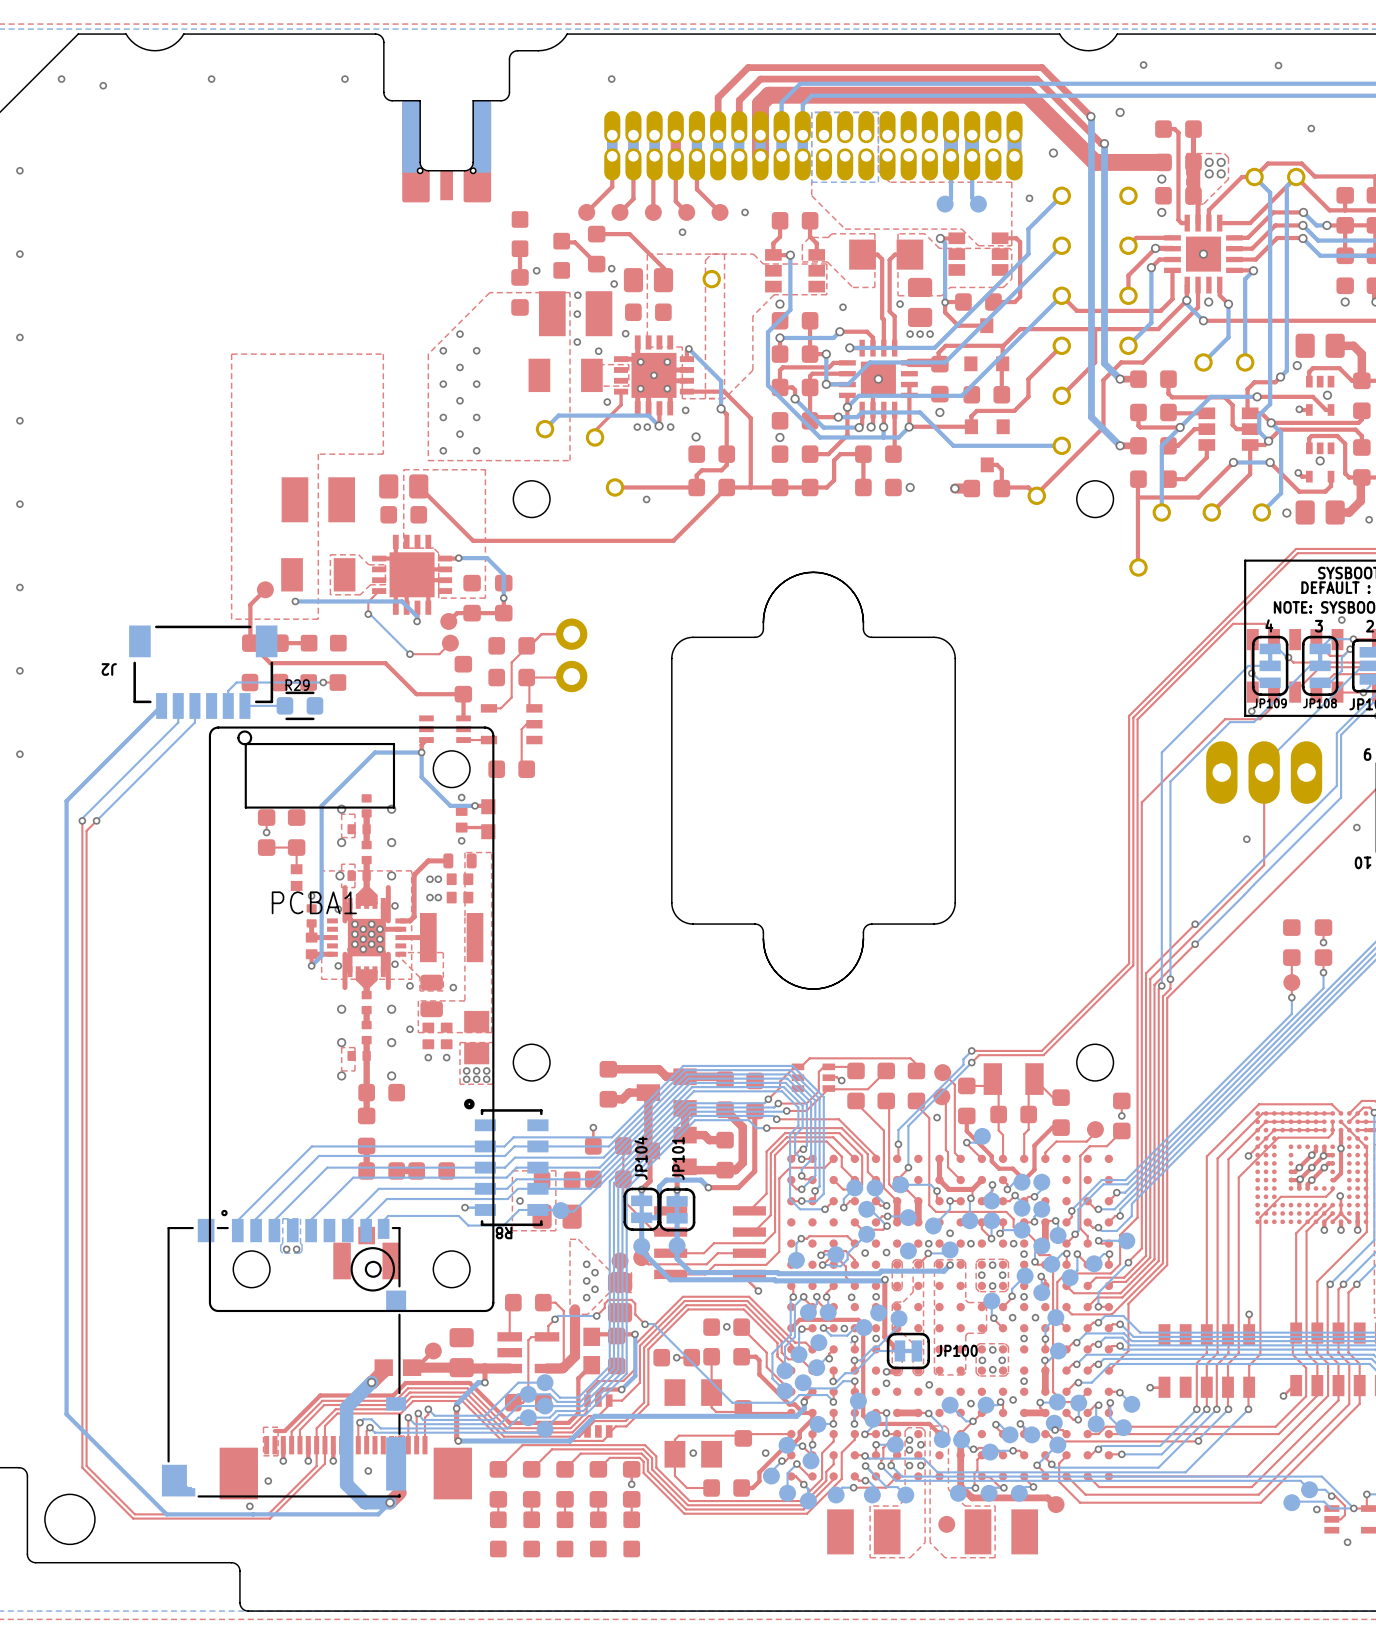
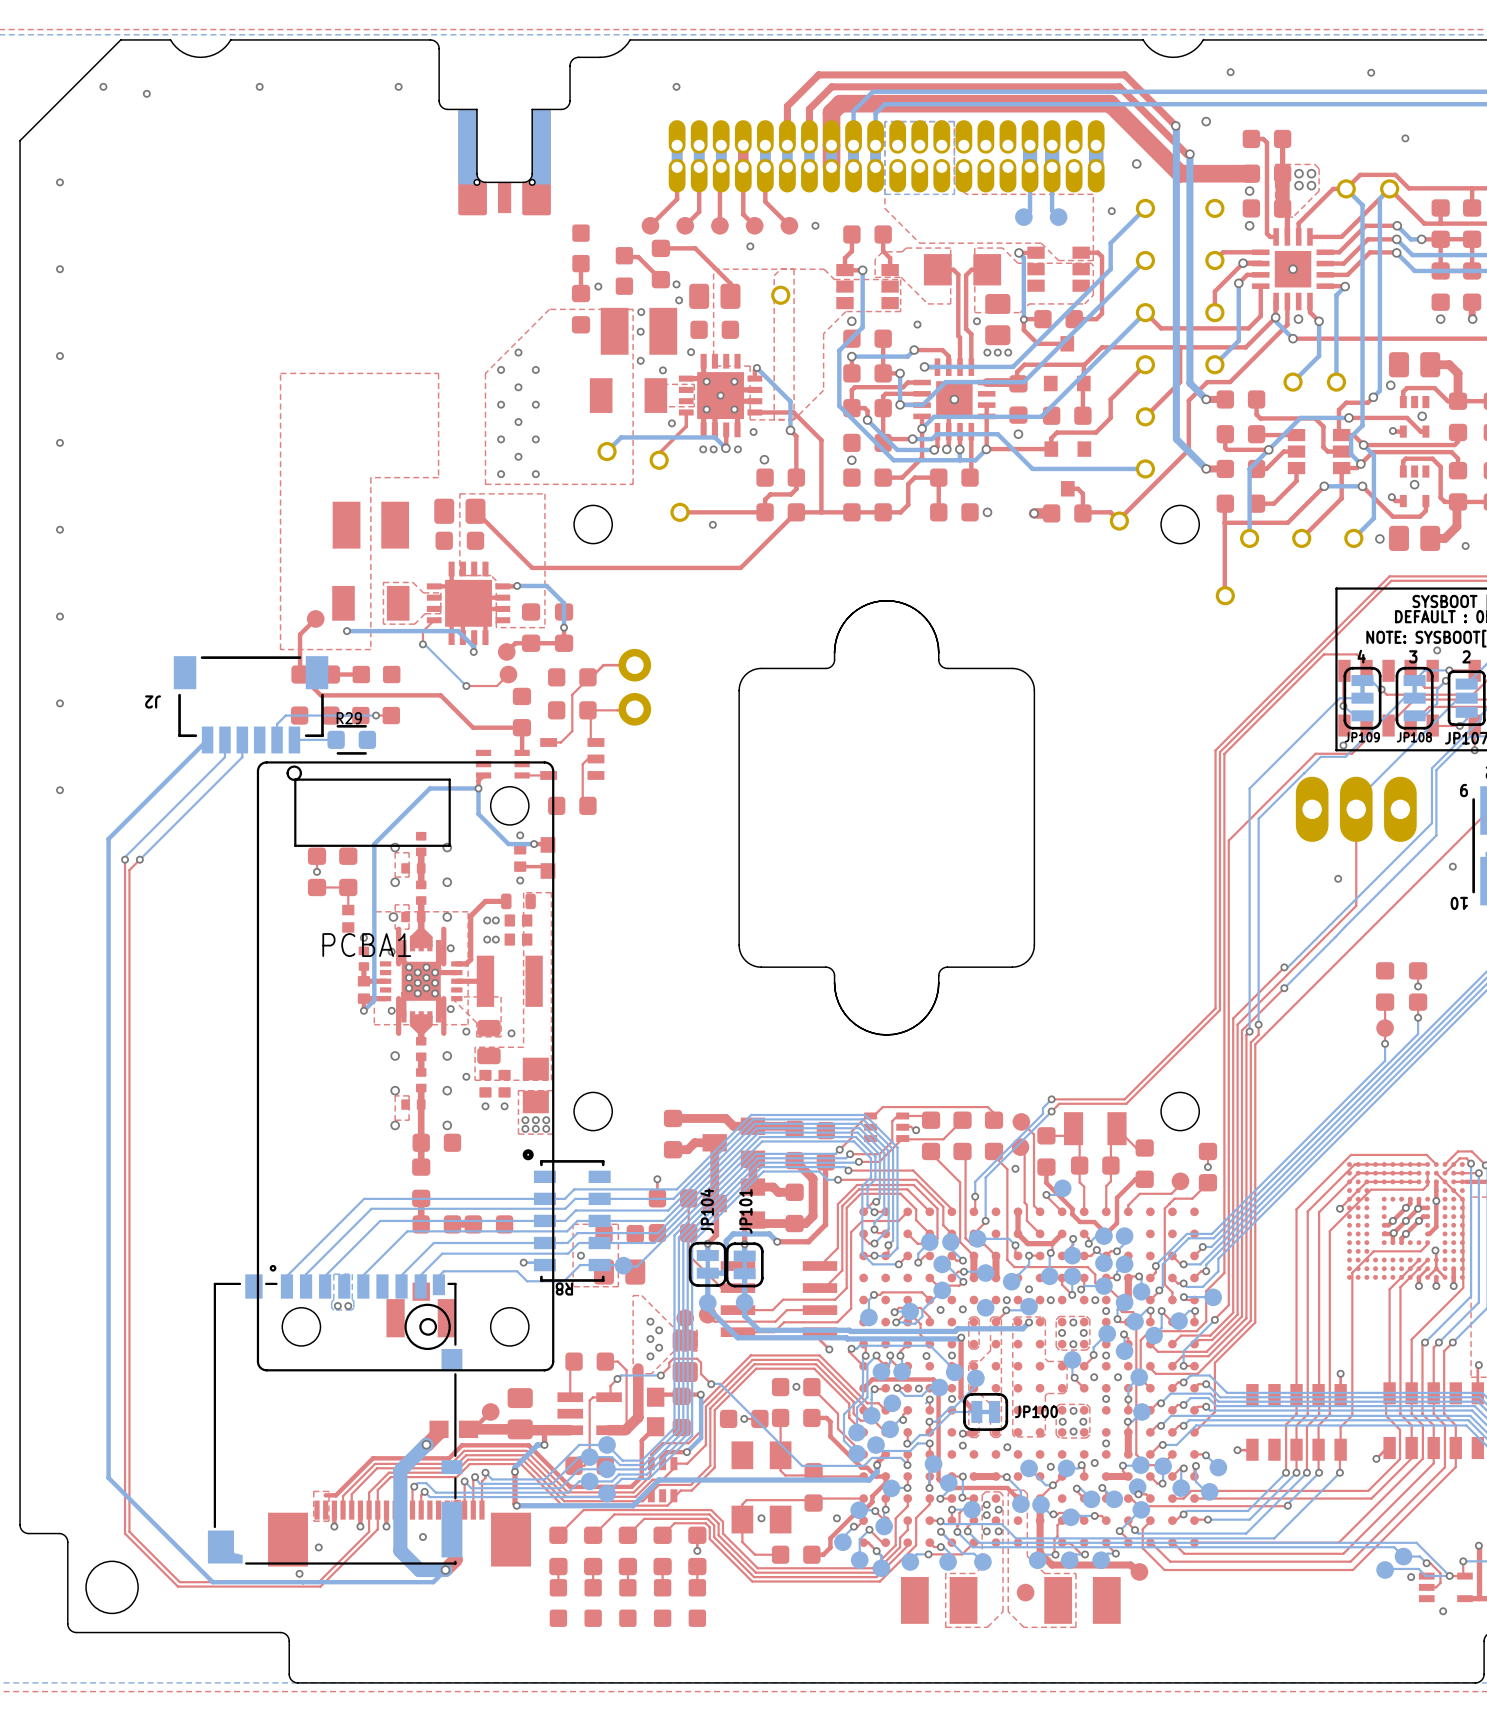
top track: none -> (851, 1348) (848, 1351) (863, 1366)
bottom track: none -> (851, 1348) (856, 1348) (859, 1345) (930, 1345) (954, 1372)
via: none -> (851, 1348)

